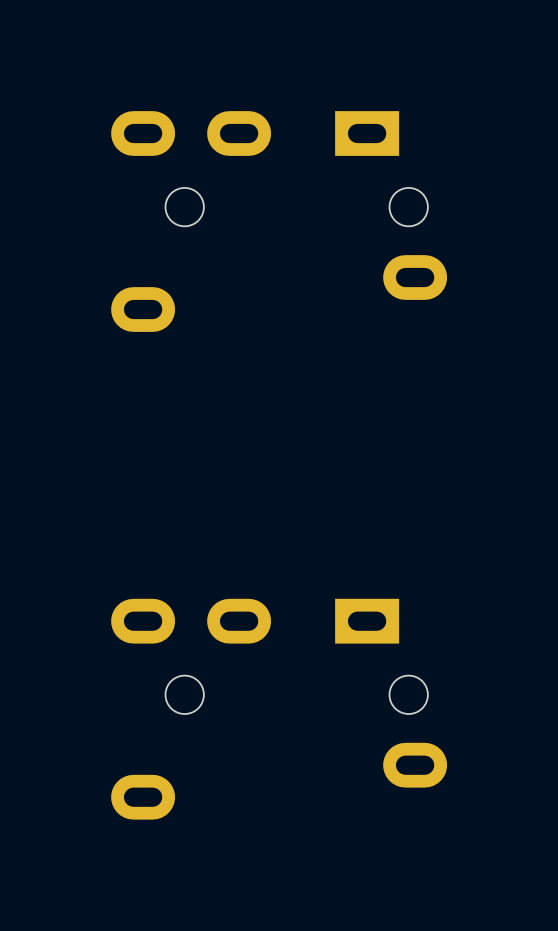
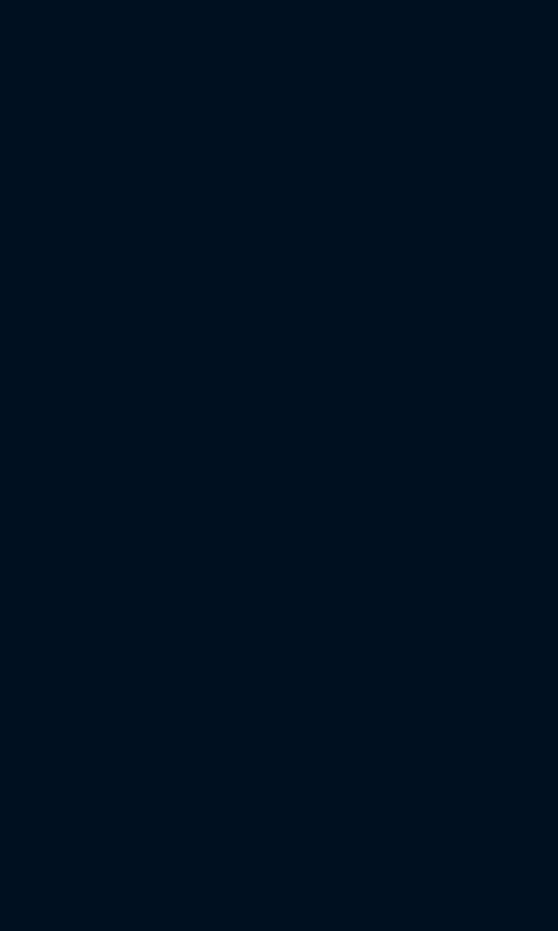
part: (279, 221) -> none
part: (279, 709) -> none

